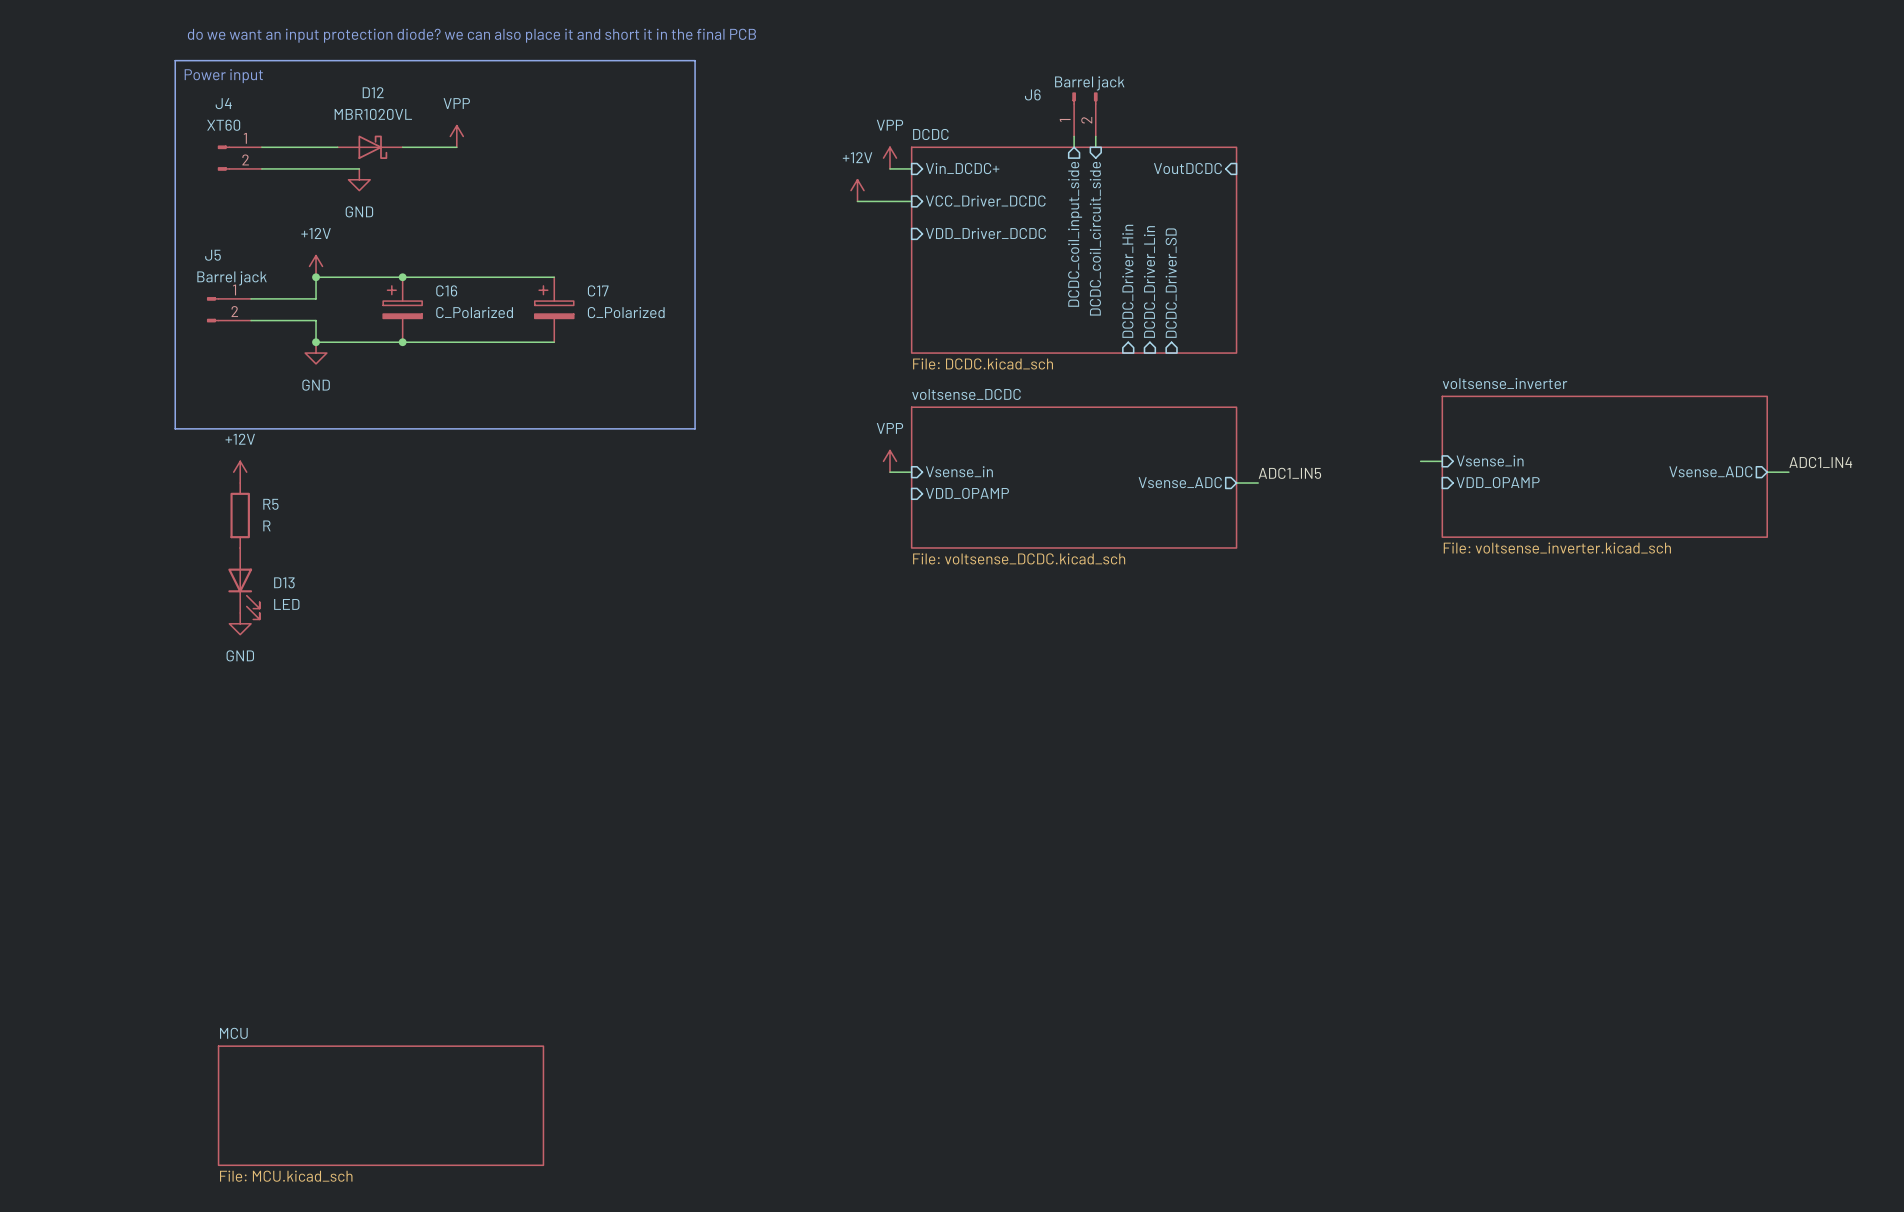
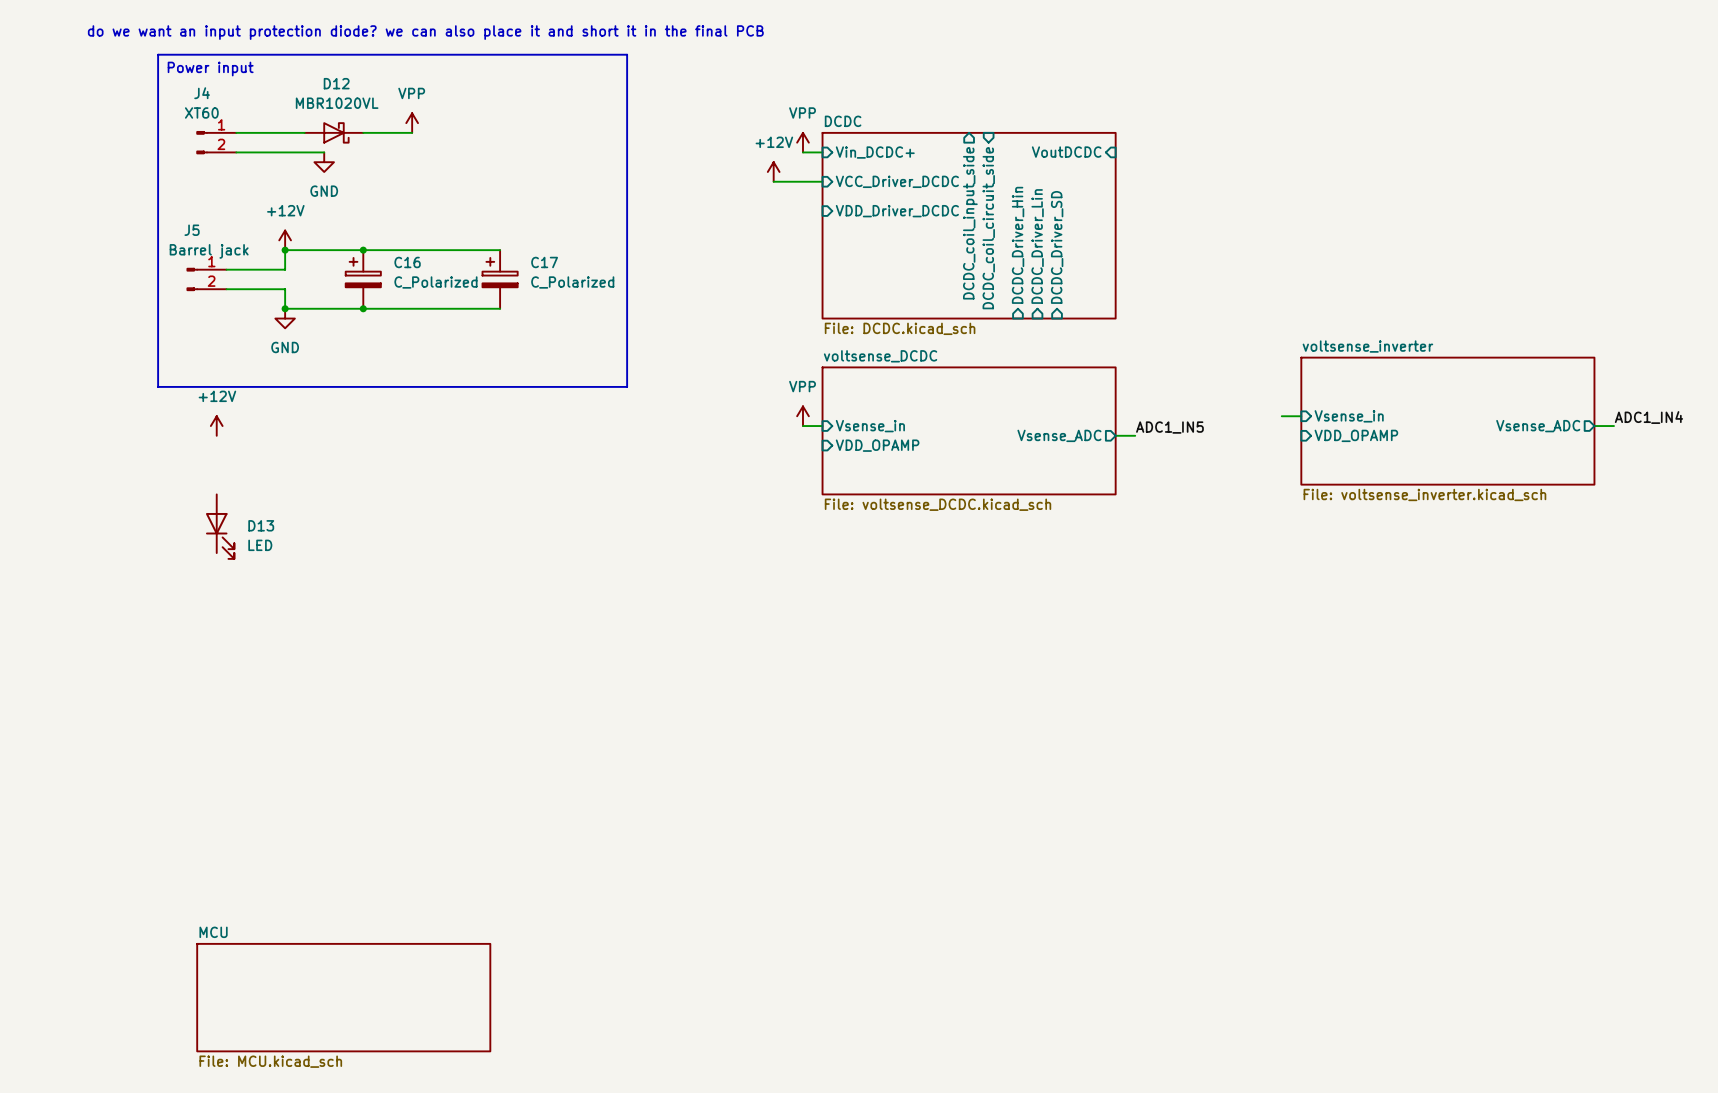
J6: Barrel jack (1084, 114) -> none
wire: (1074, 136) (1074, 147) -> none
wire: (1095, 136) (1095, 147) -> none
R5: R (240, 515) -> none
power symbol: GND (240, 623) -> none

